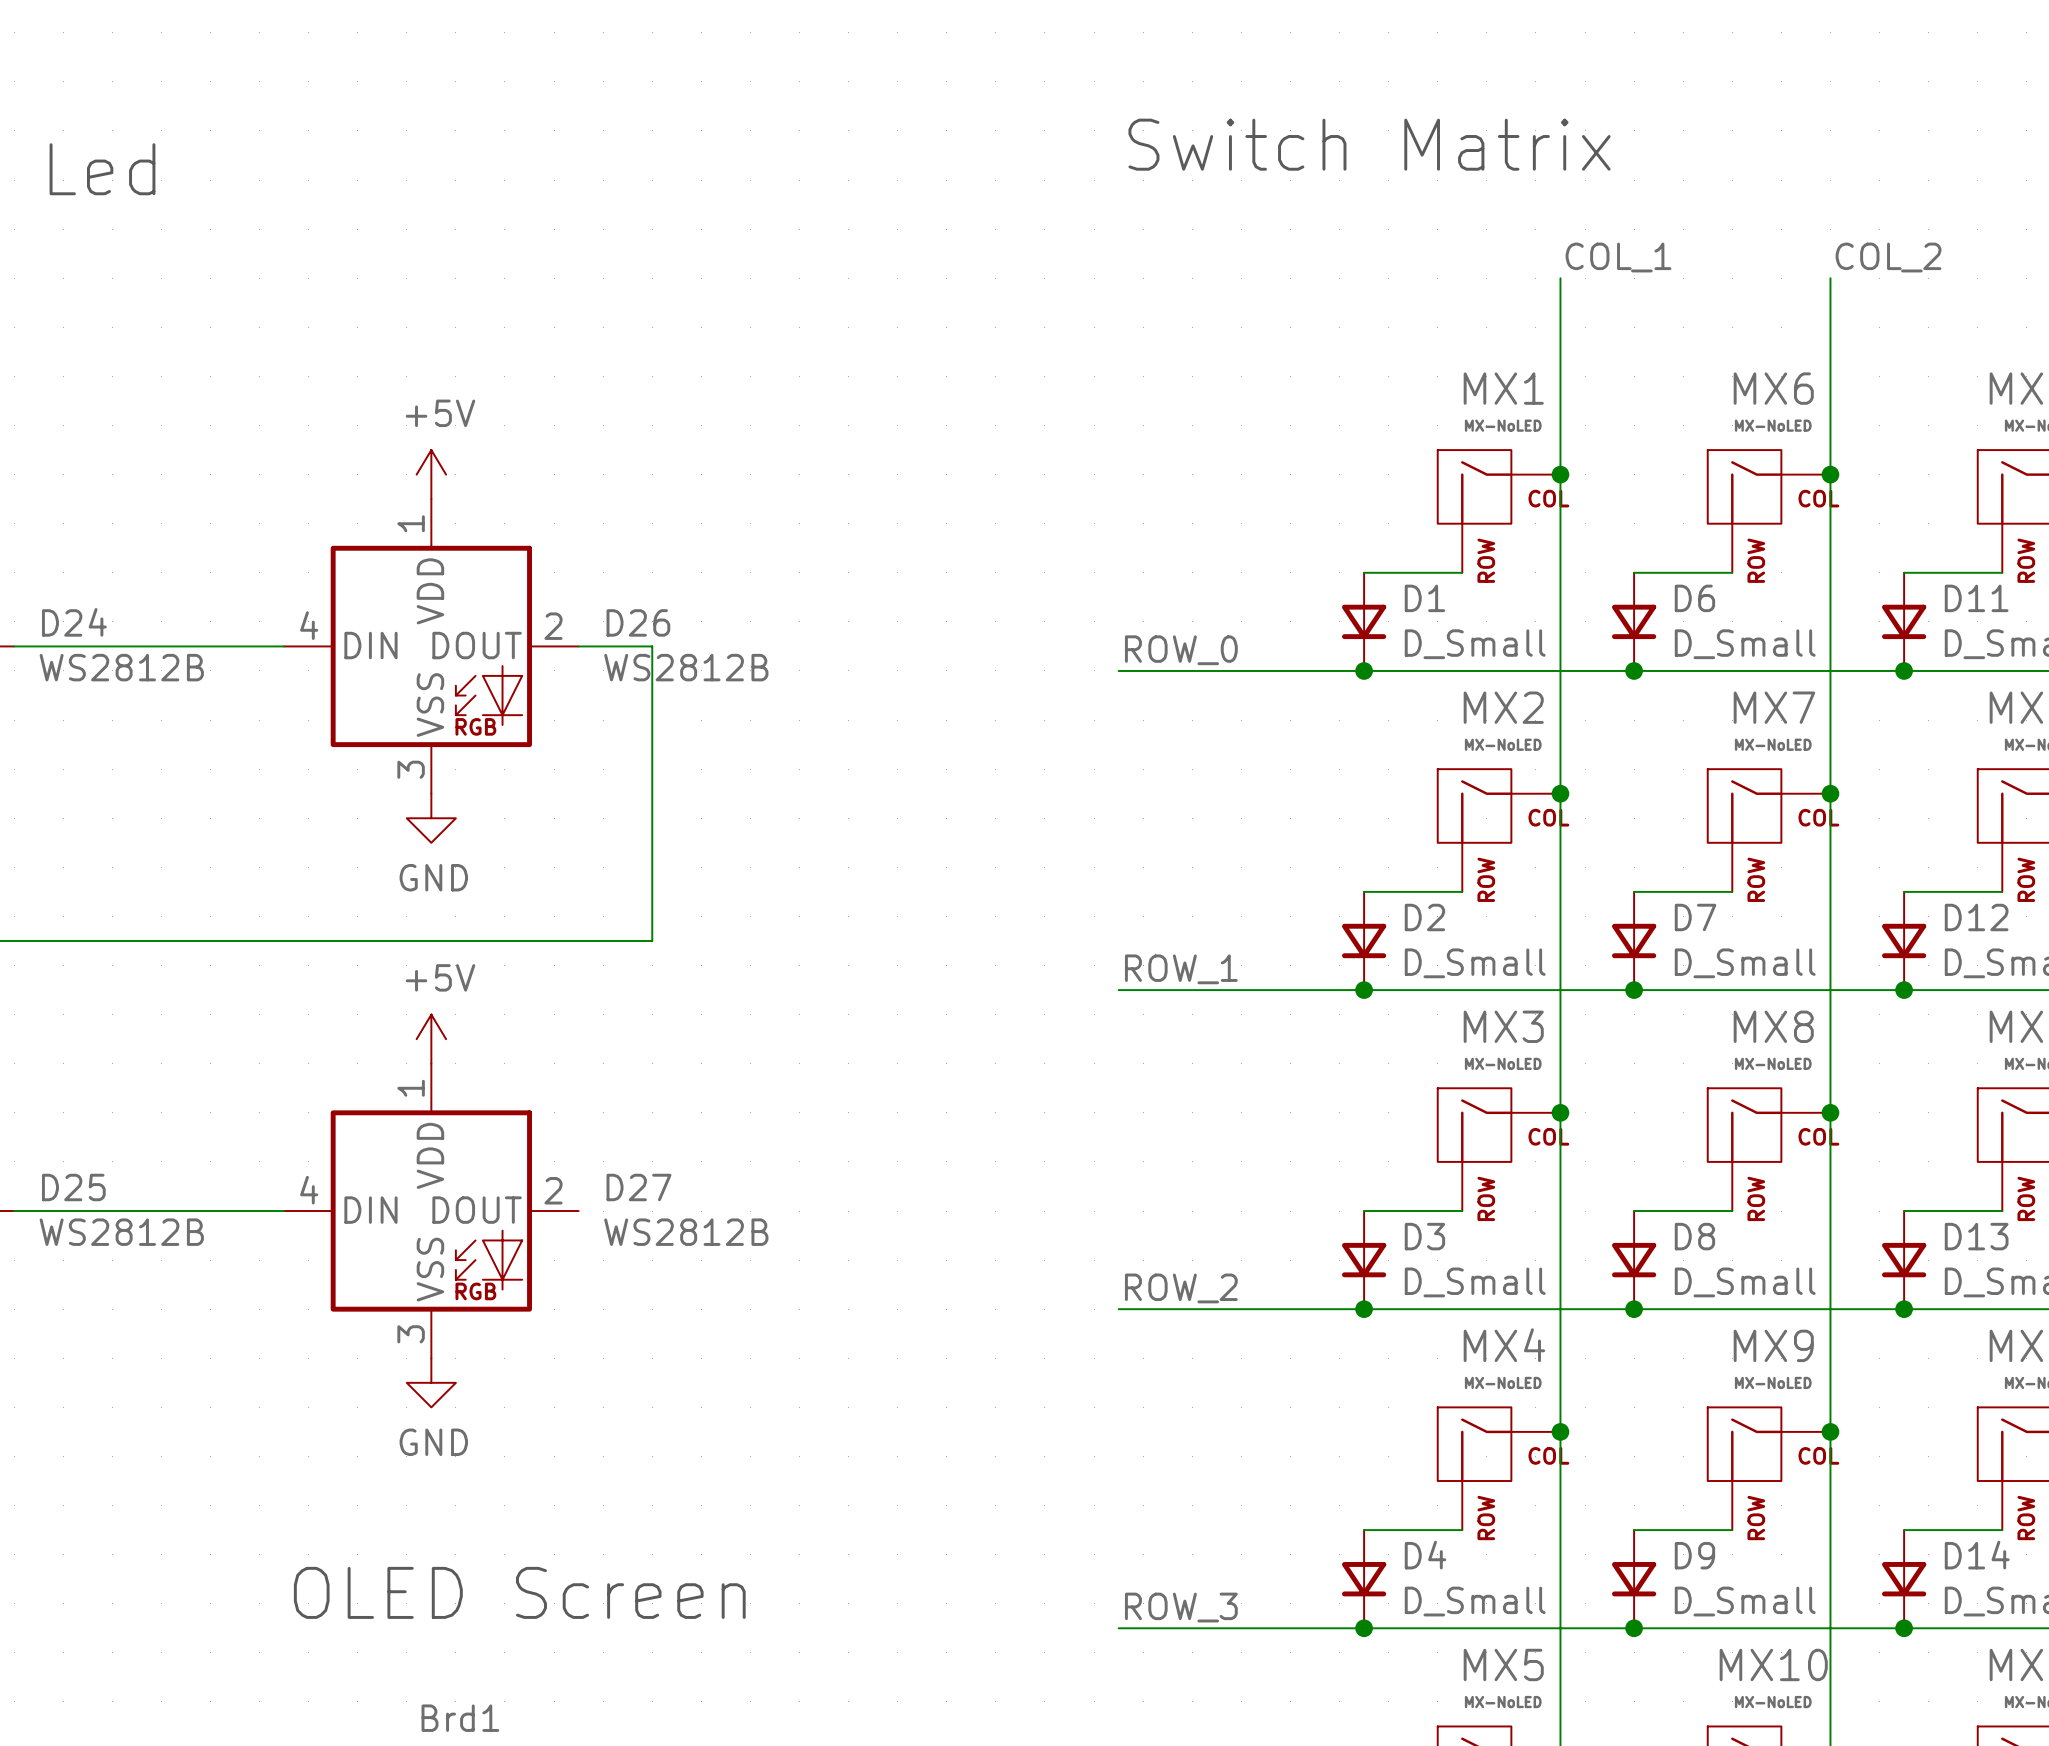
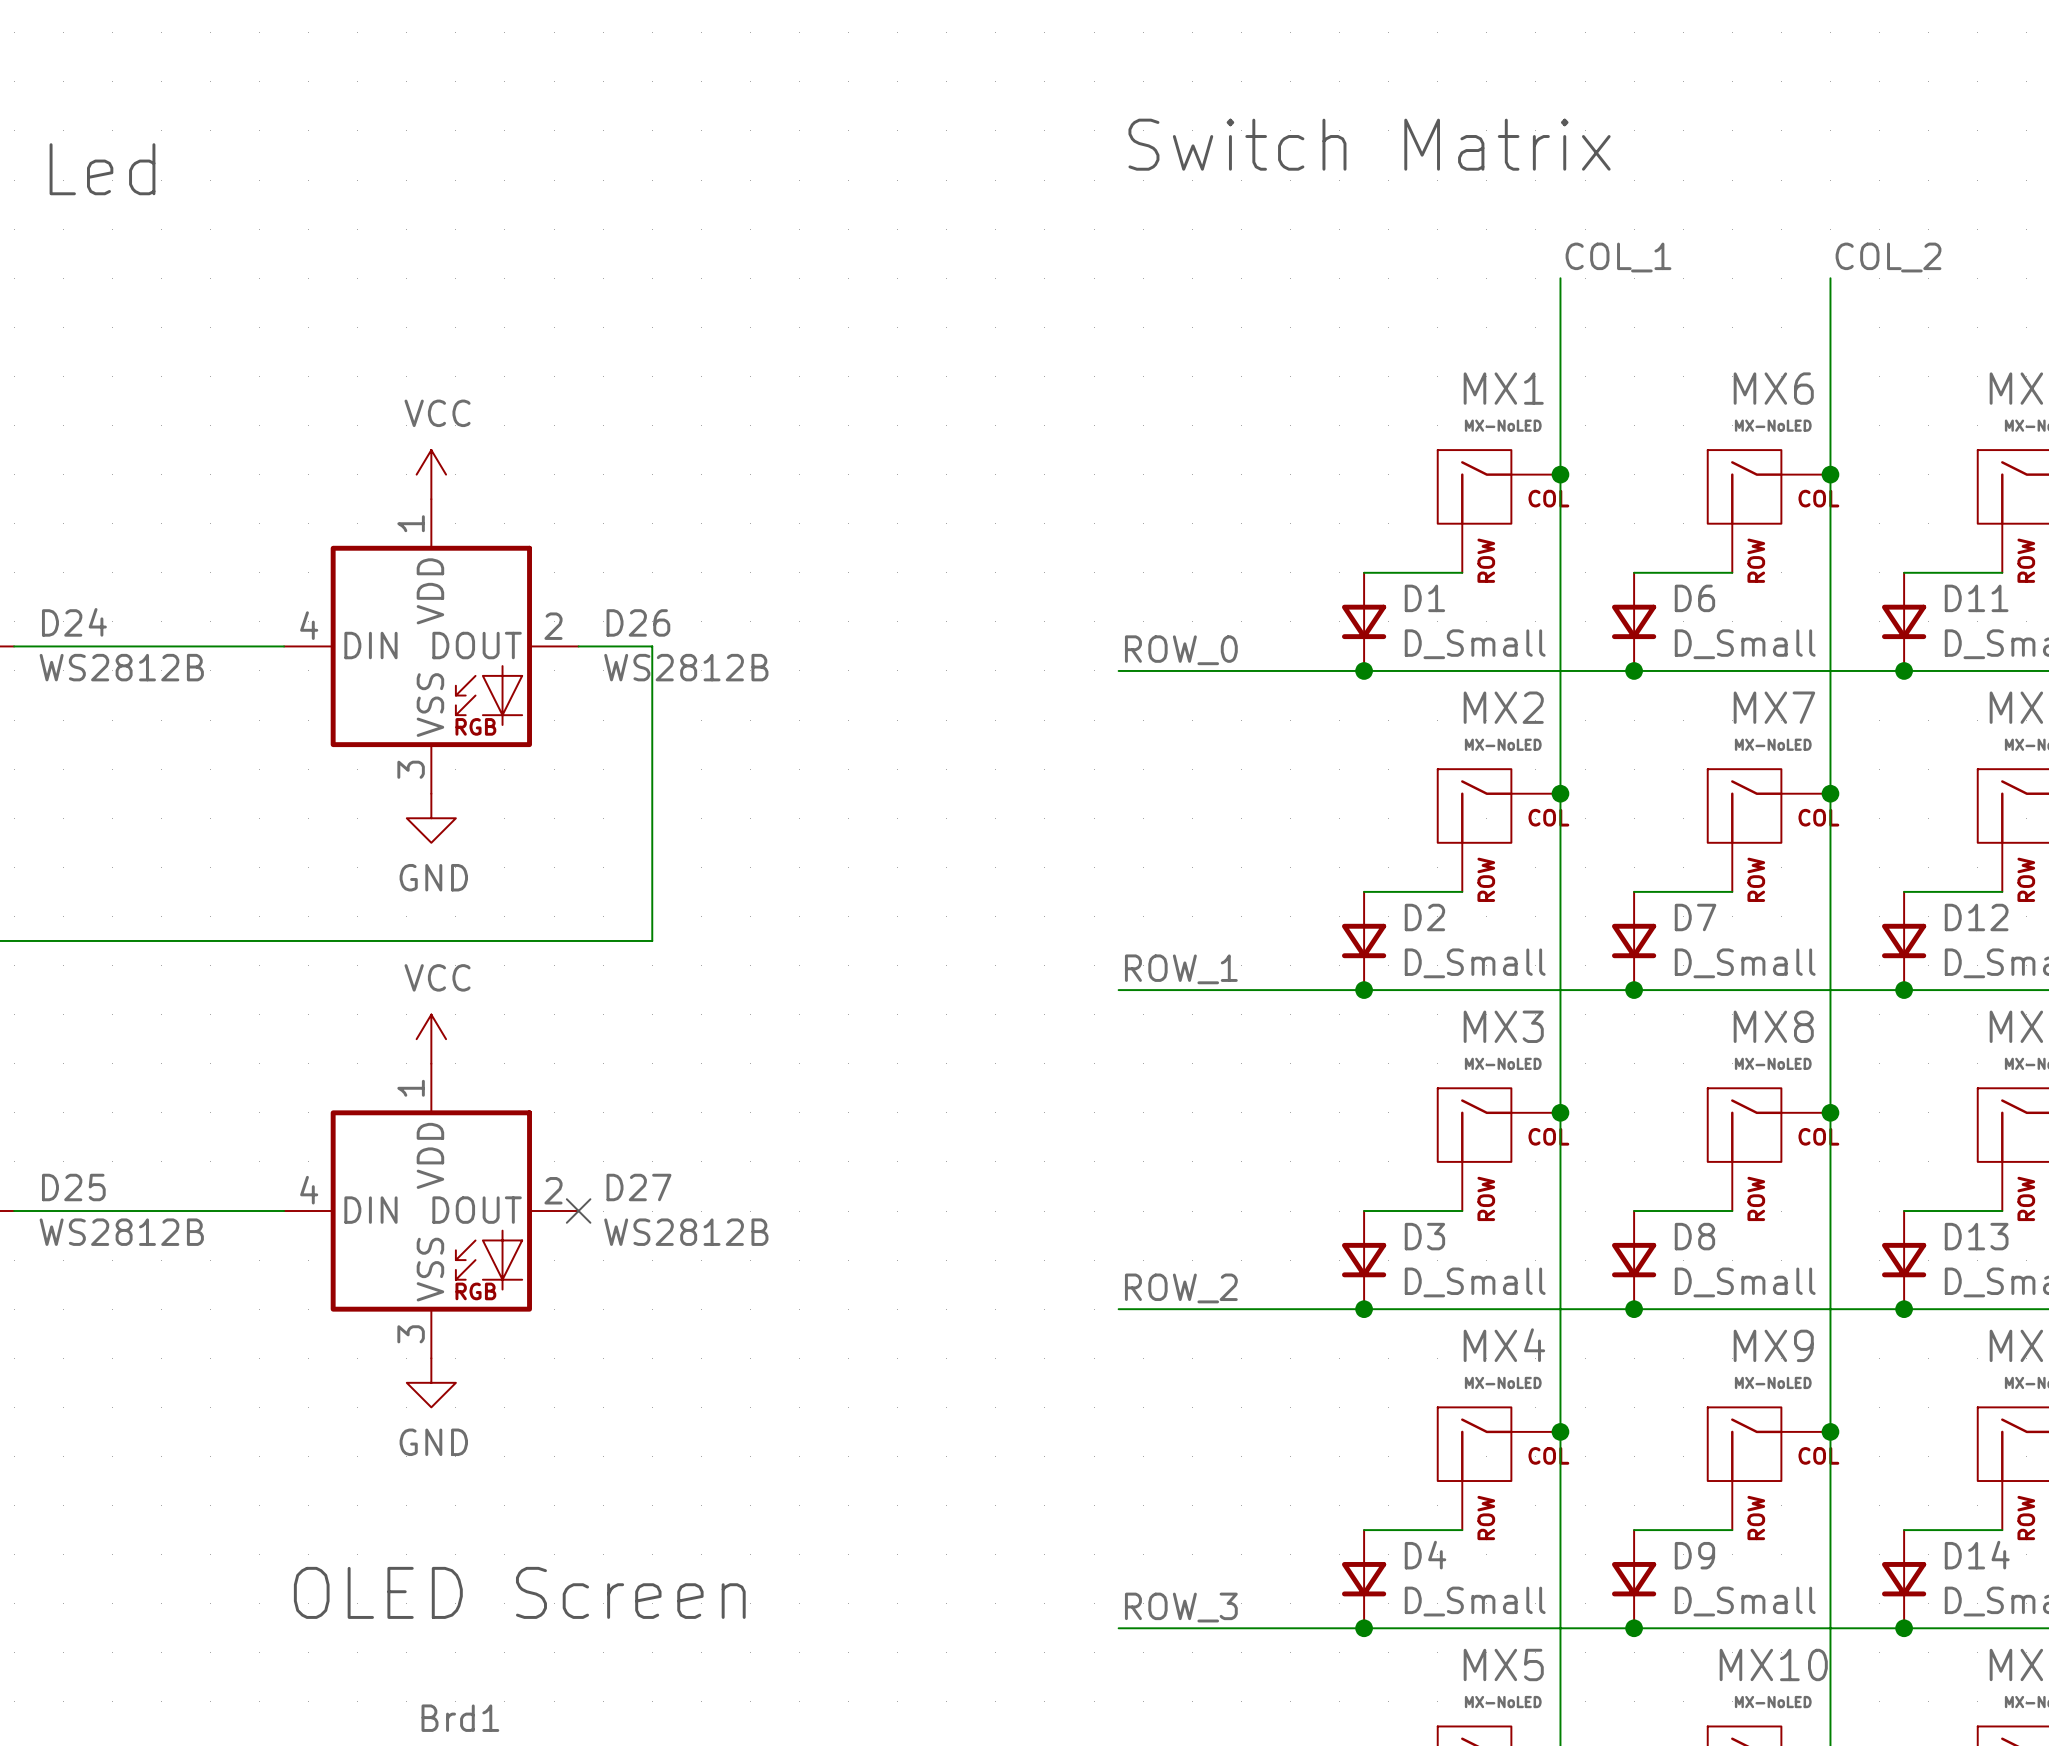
power symbol: +5V (431, 474) -> VCC (431, 474)
power symbol: +5V (431, 1039) -> VCC (431, 1039)
no-connect mark: none -> (578, 1211)

